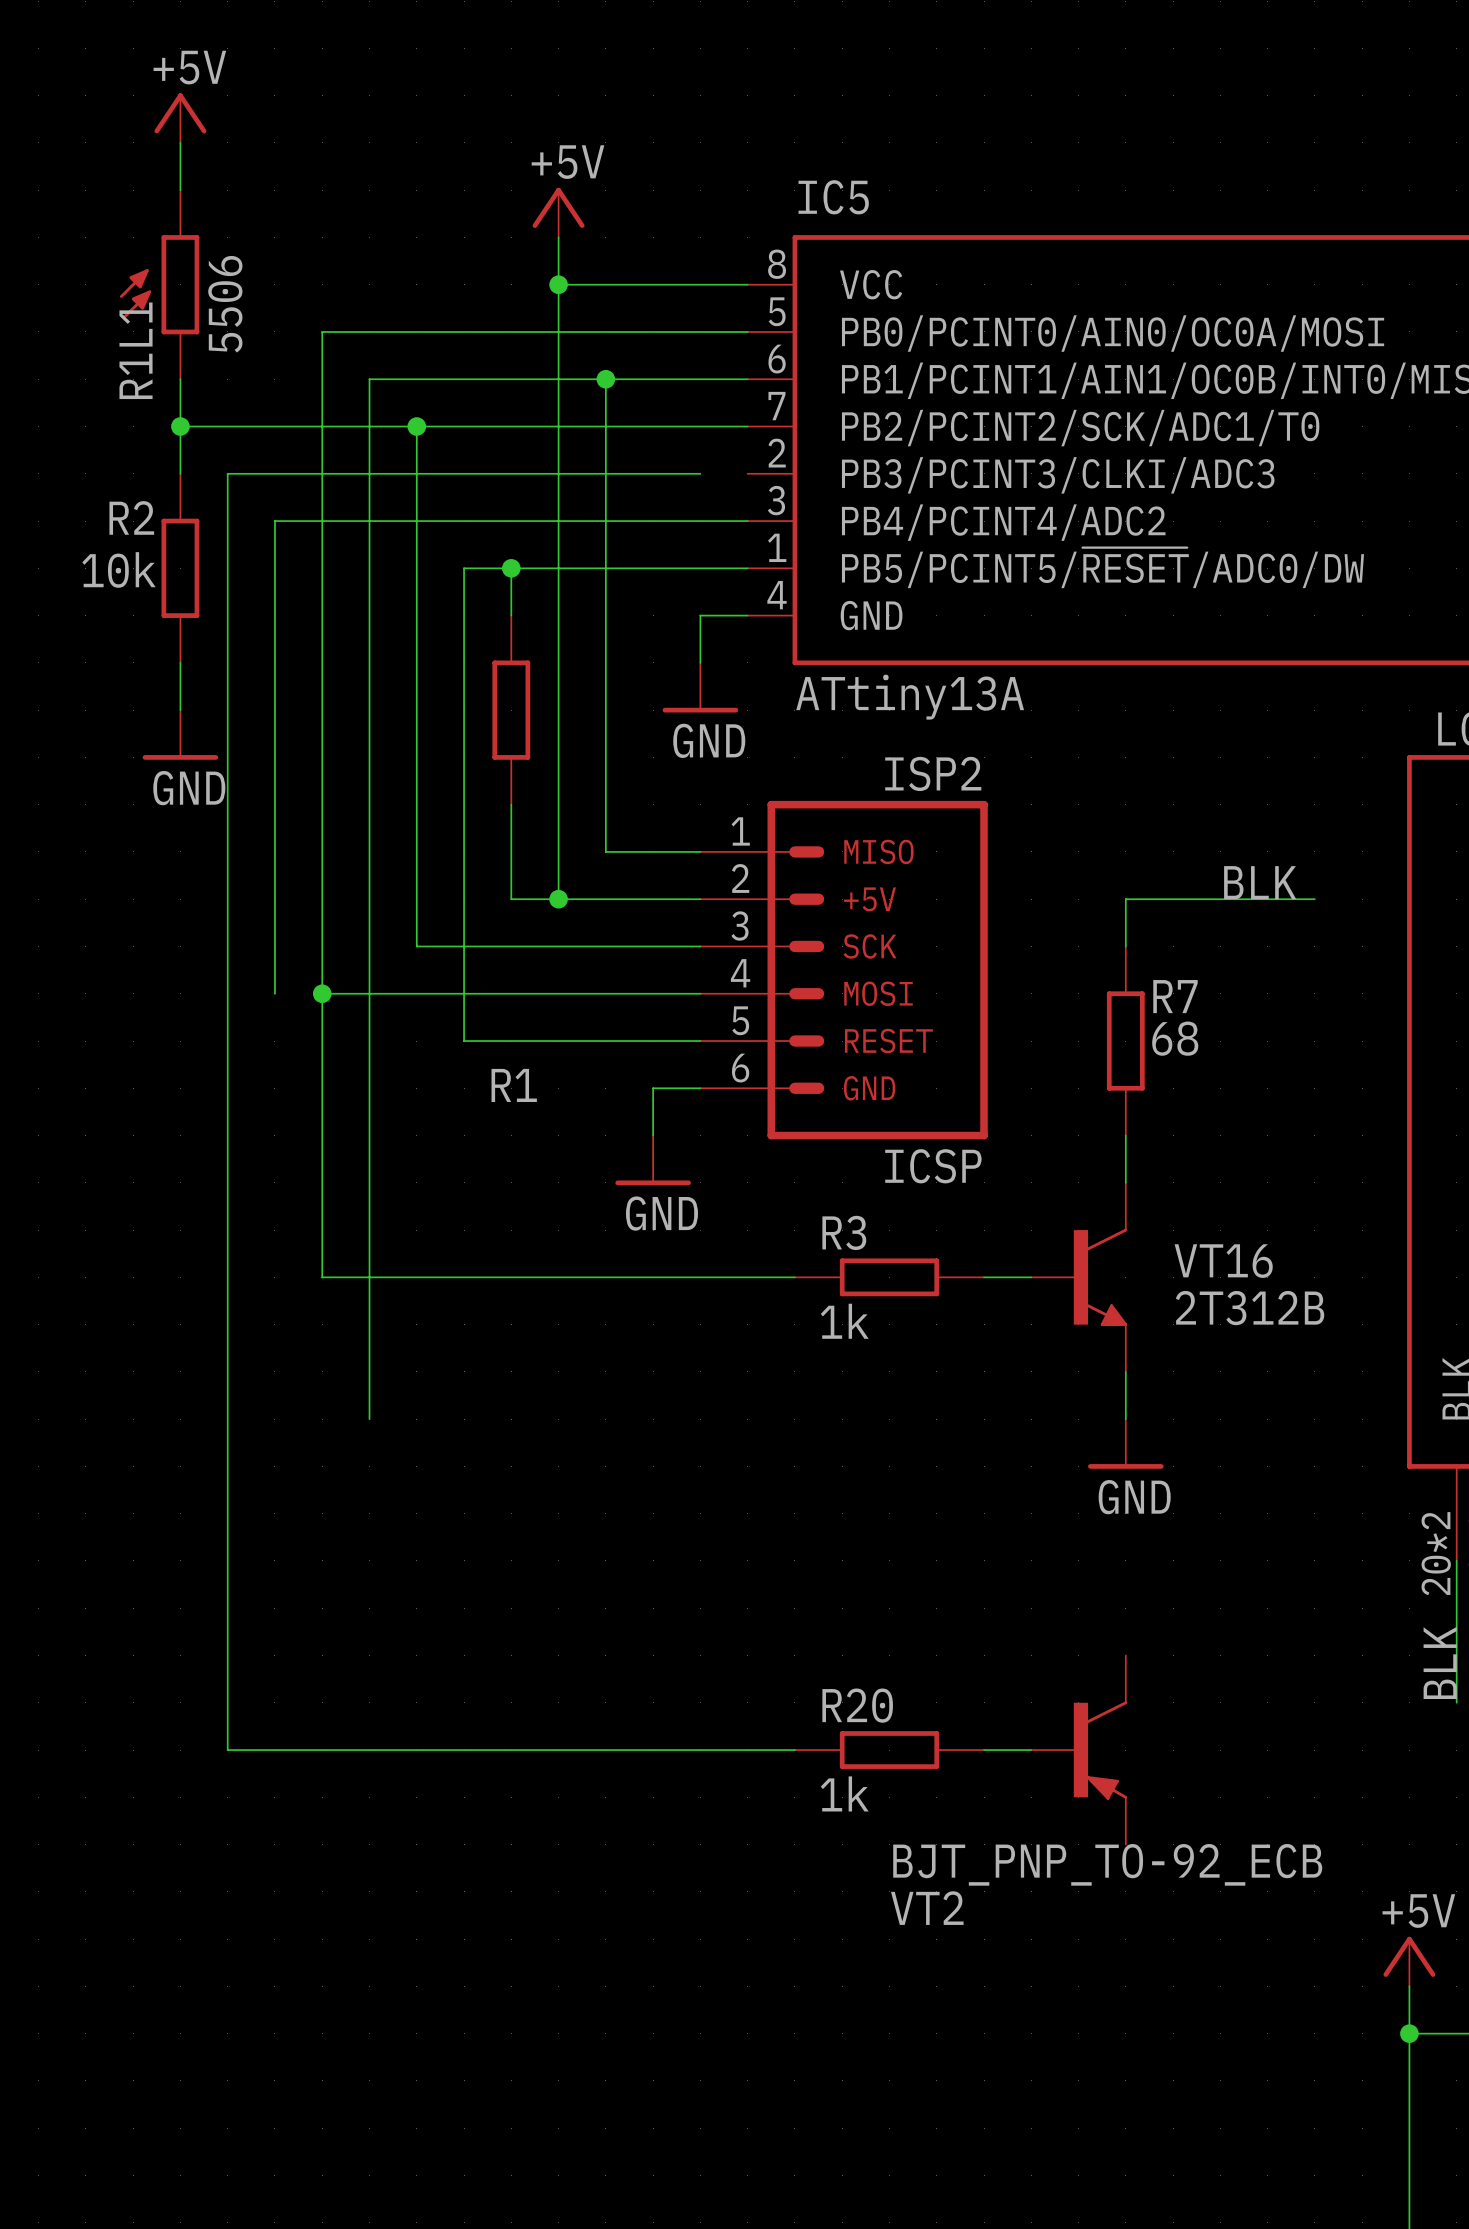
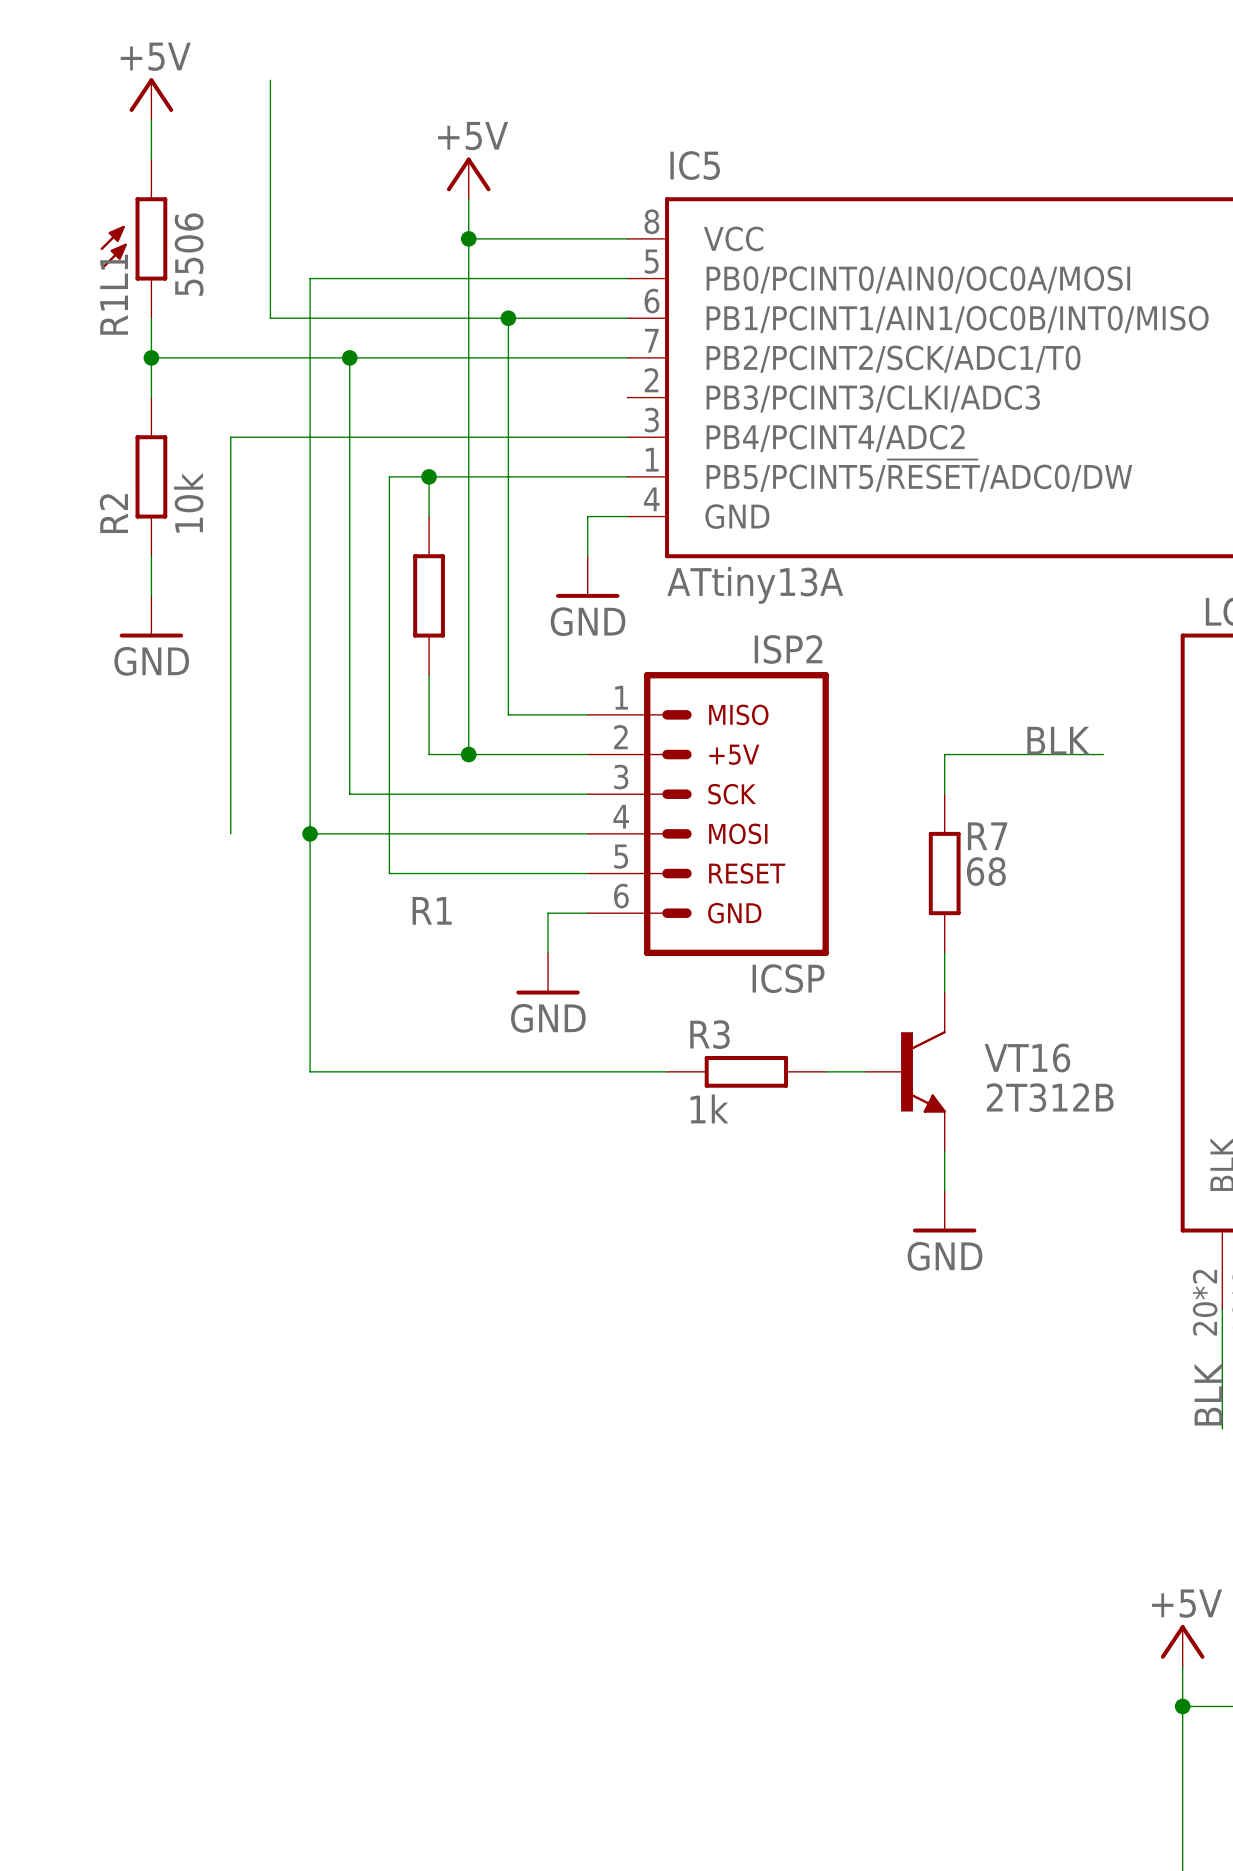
wire: none -> (270, 80) (270, 278)
wire: (322, 331) (369, 331) -> (270, 318) (310, 318) (310, 278)
wire: (322, 379) (322, 1277) (369, 1277) (369, 1419) -> none
wire: (700, 473) (227, 473) (227, 1750) (794, 1750) -> none
R2 name rotation: 0° (131, 517) -> 90° counterclockwise (113, 513)
R2 name position: R2 (131, 517) -> R2 (113, 513)
R2 value rotation: 0° (118, 569) -> 90° counterclockwise (188, 502)
R2 value position: 10k (118, 569) -> 10k (188, 502)
wire: (322, 993) (369, 993) -> none
junction position: (322, 993) -> (310, 833)
R20: 1k (889, 1750) -> none
wire: (984, 1750) (1031, 1750) -> none
VT2: BJT_PNP_TO-92_ECB (1079, 1750) -> none

